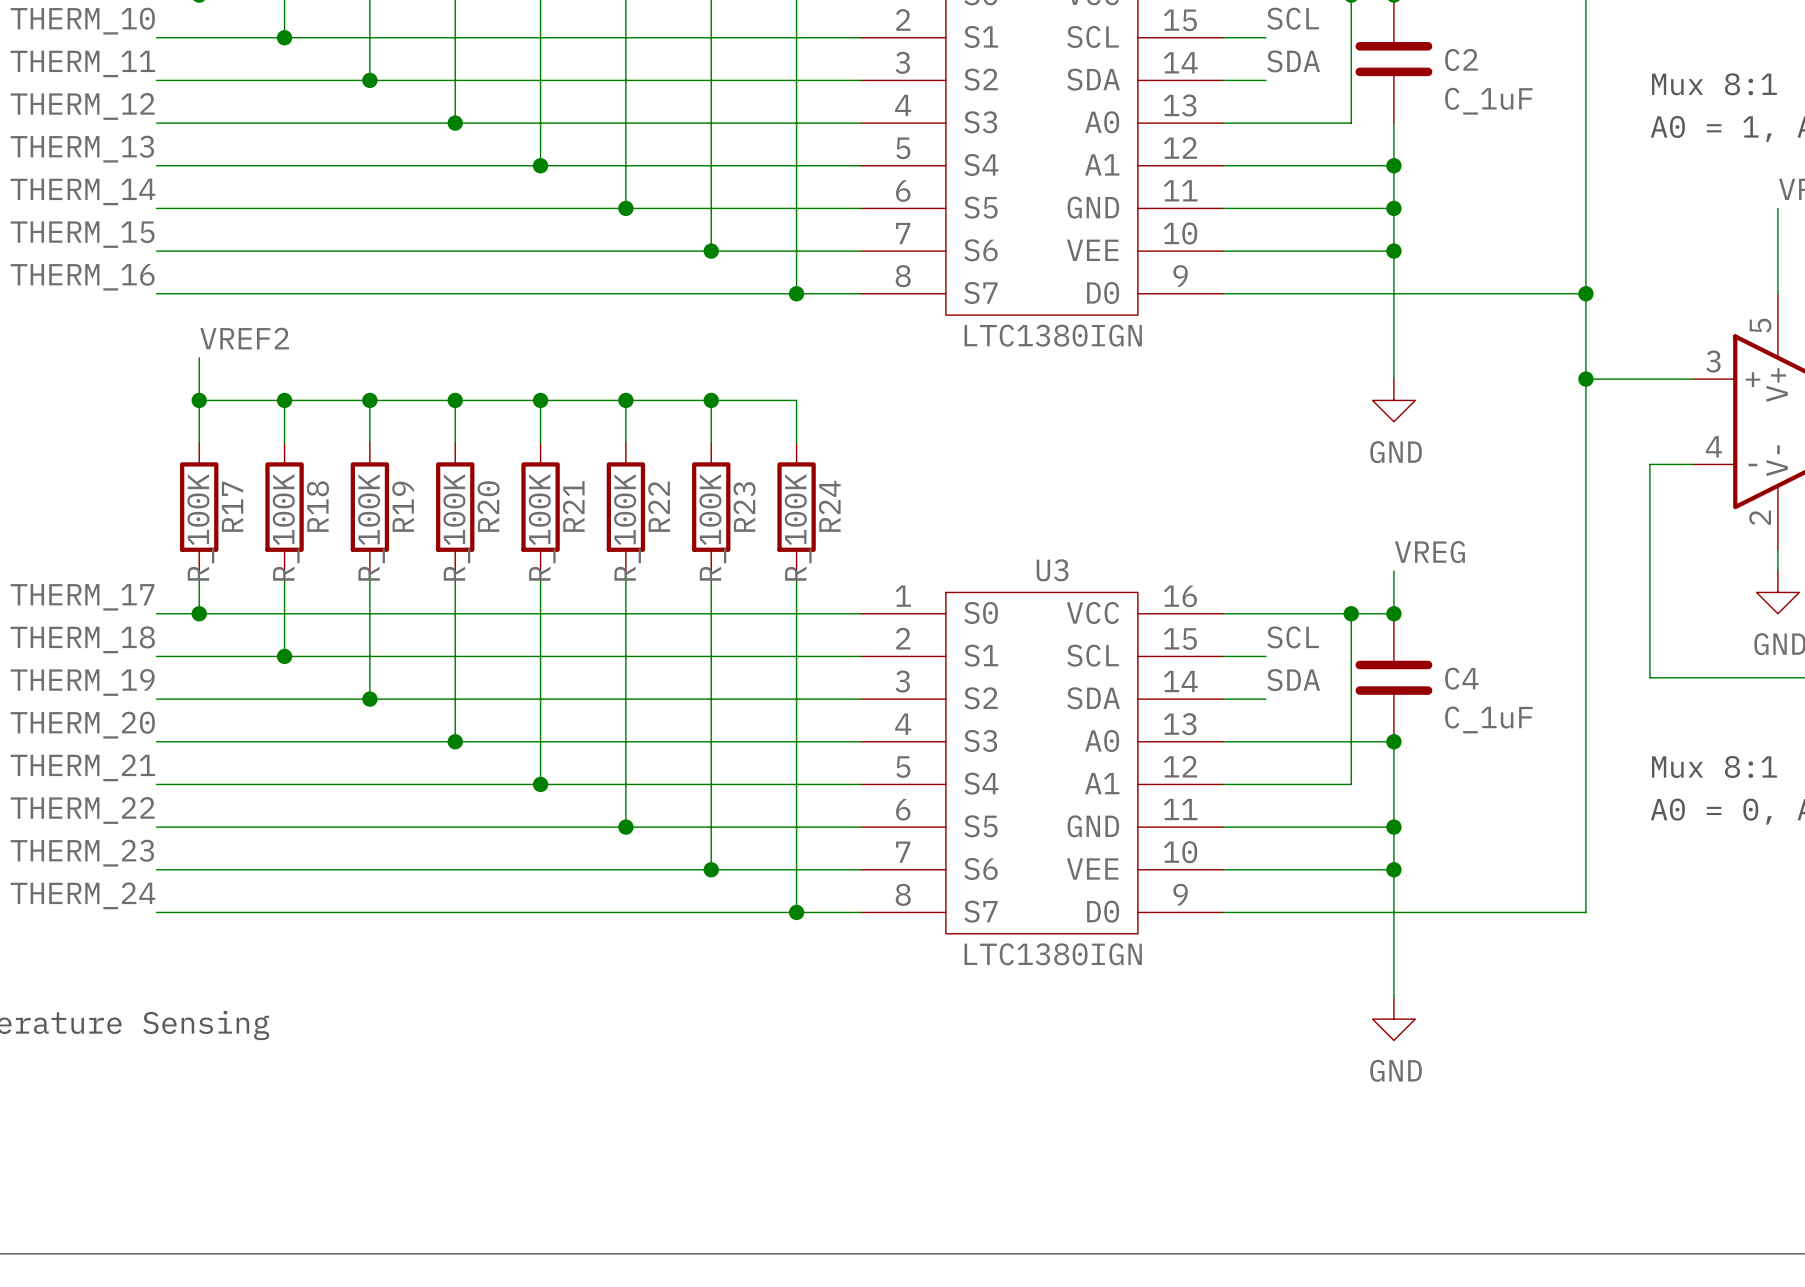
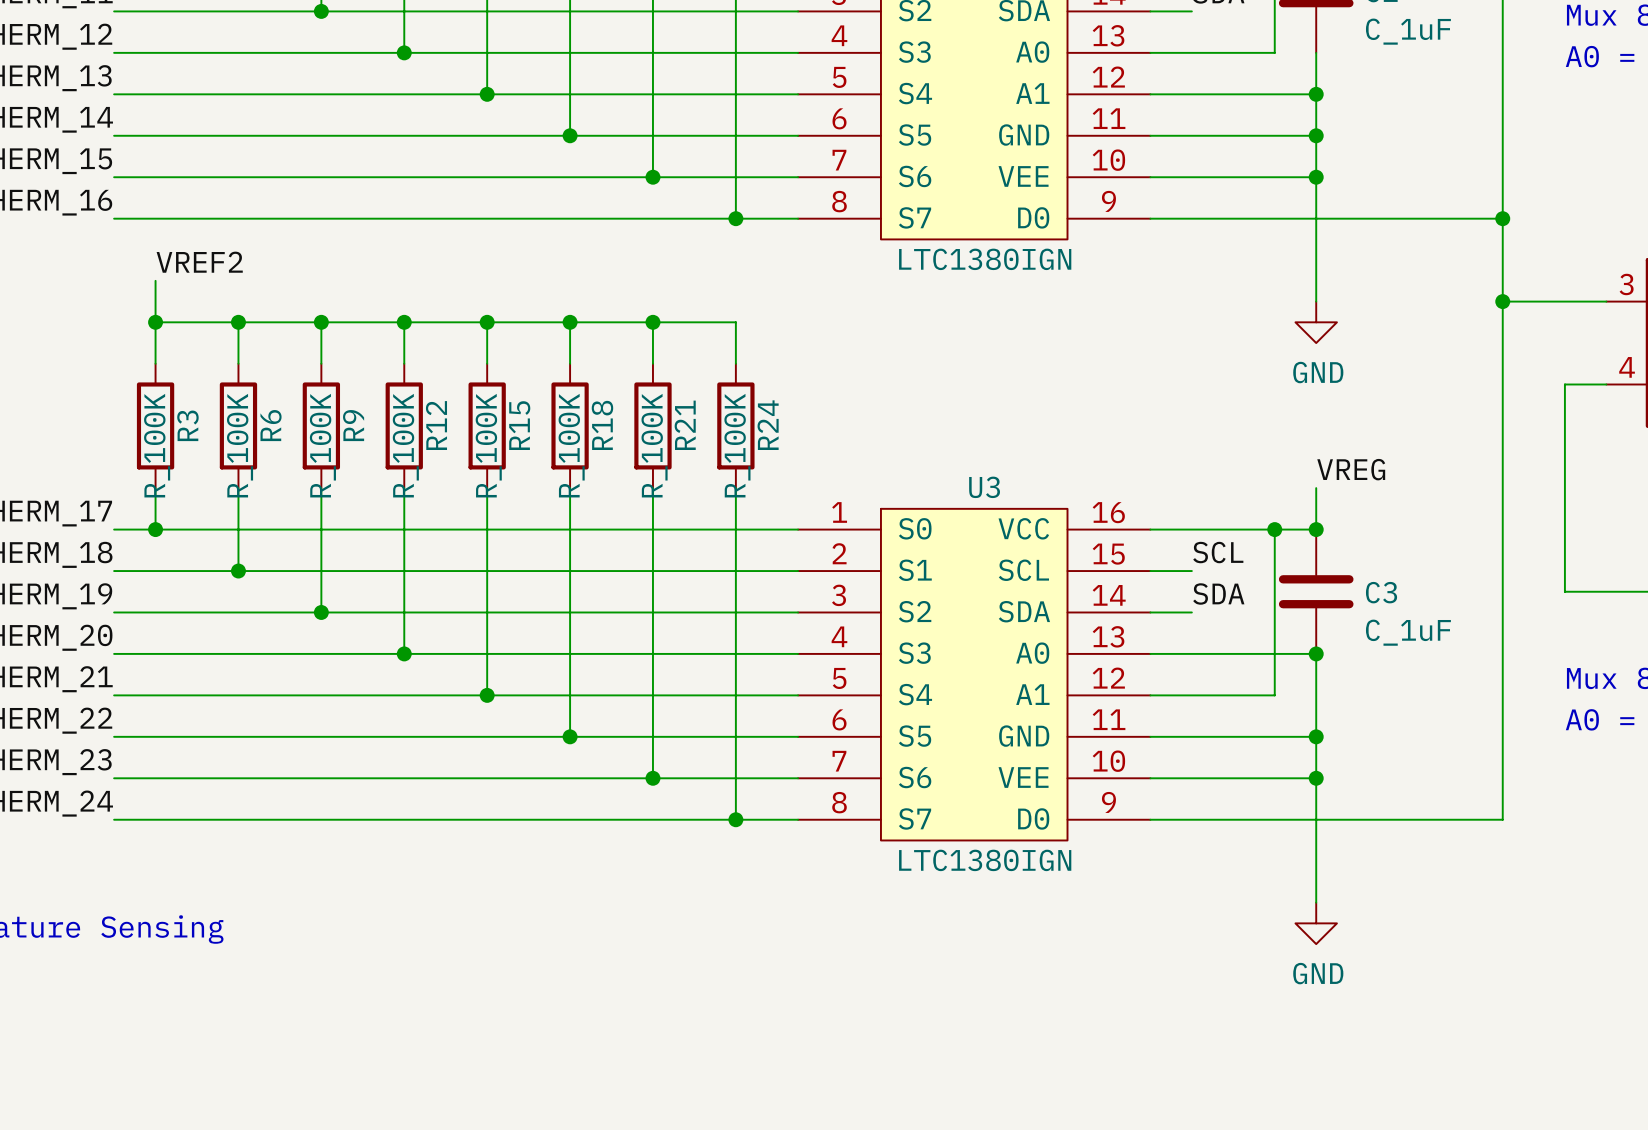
R17 name: R17 (232, 506) -> R3 (187, 425)
R18 name: R18 (317, 506) -> R6 (271, 425)
R19 name: R19 (403, 506) -> R9 (353, 425)
R20 name: R20 (488, 506) -> R12 (436, 425)
R21 name: R21 (573, 506) -> R15 (519, 425)
R22 name: R22 (659, 506) -> R18 (602, 425)
R23 name: R23 (744, 506) -> R21 (685, 425)
C4 name: C4 (1461, 678) -> C3 (1381, 592)

